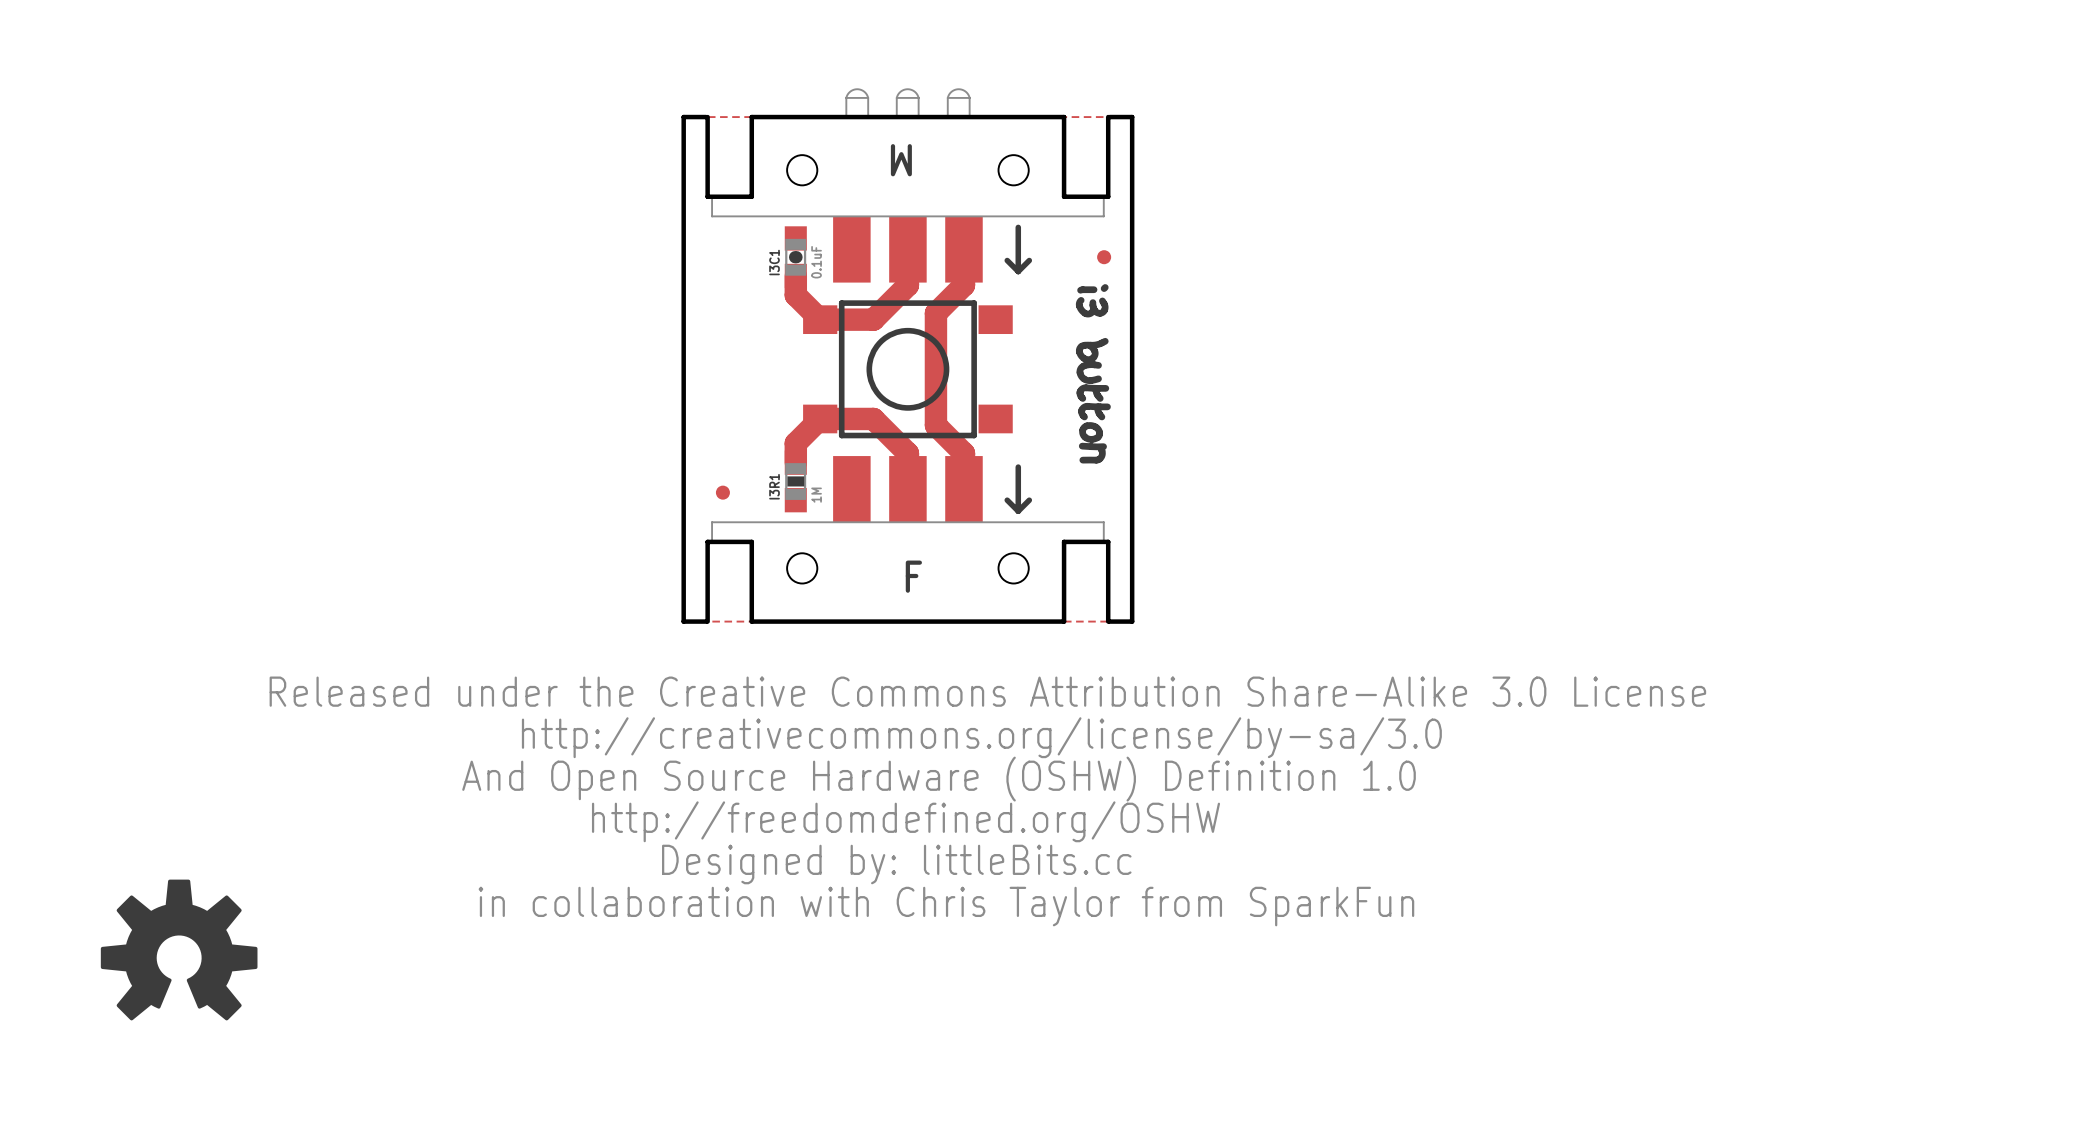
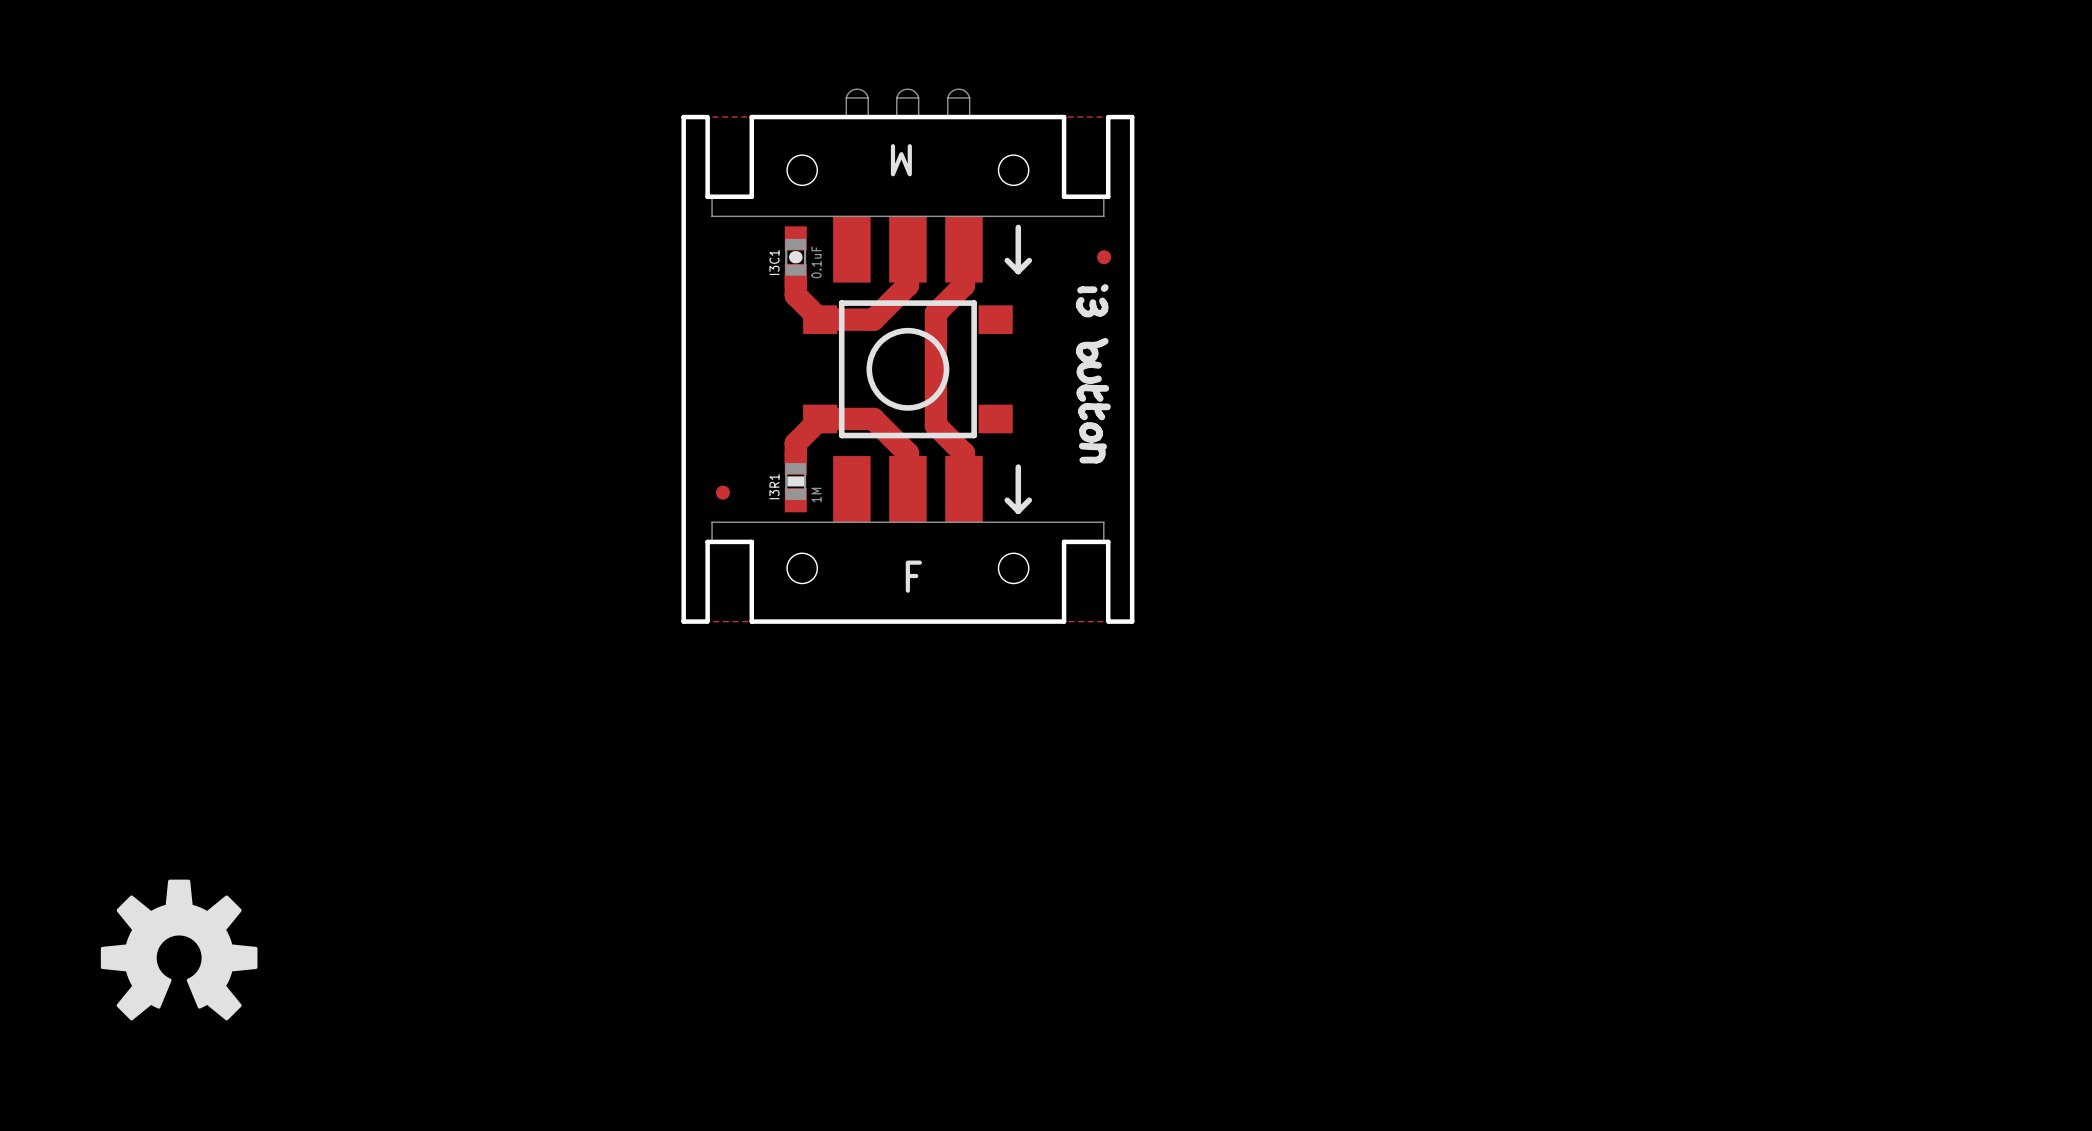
drawing: [269, 676, 1707, 927] -> none

